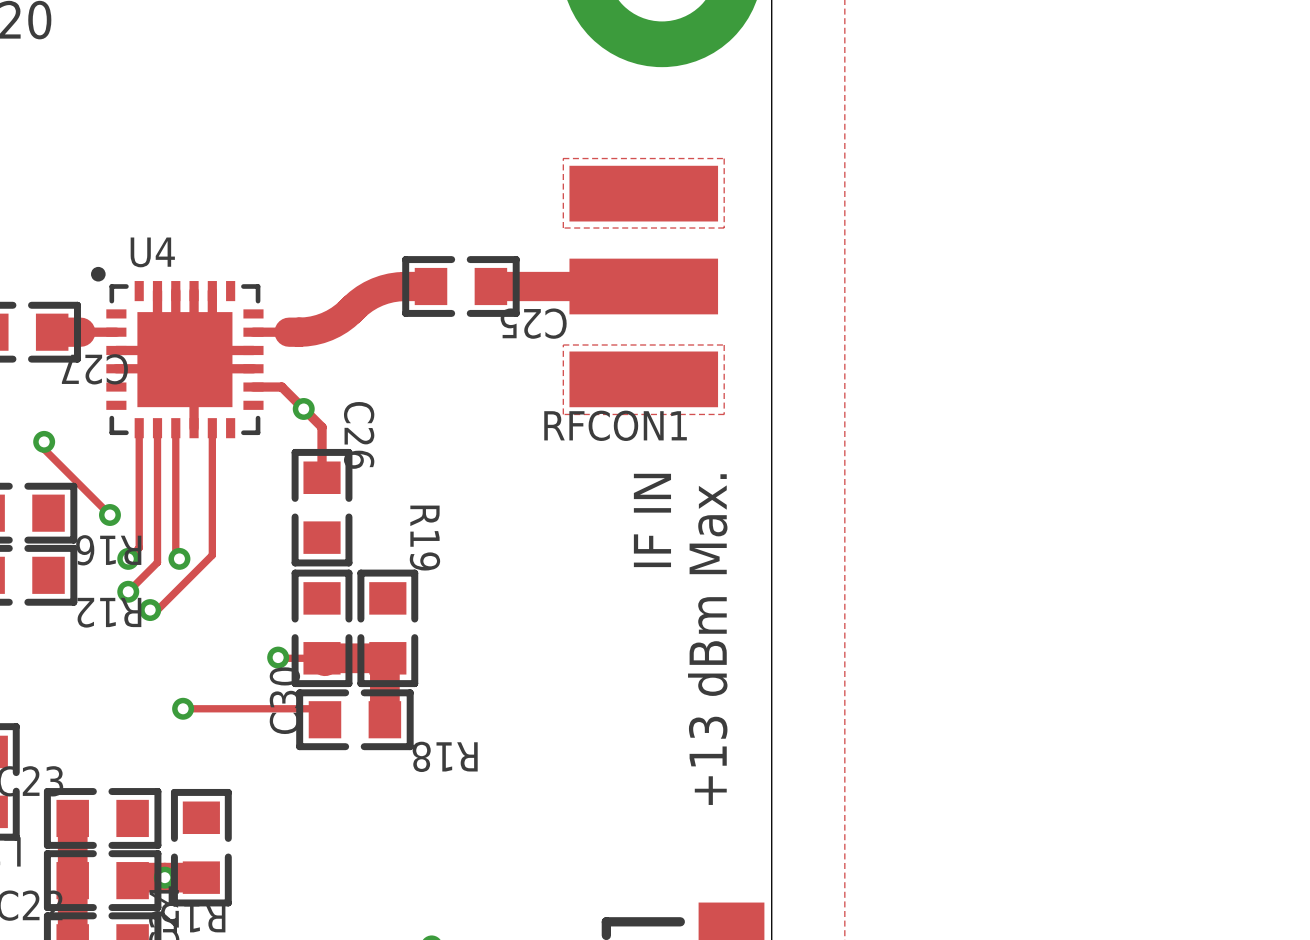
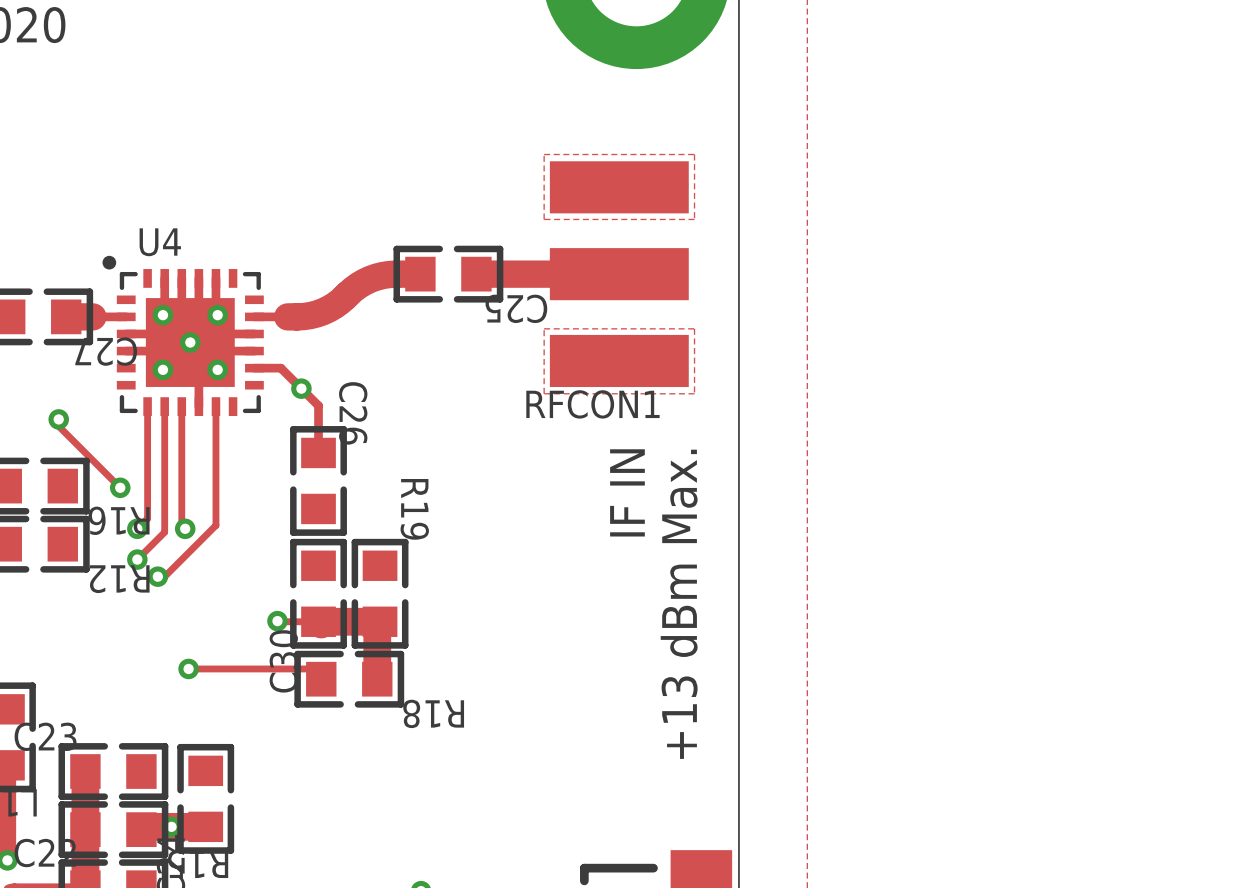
via: none -> (162, 315)
via: none -> (217, 315)
via: none -> (190, 342)
via: none -> (162, 369)
via: none -> (217, 369)

